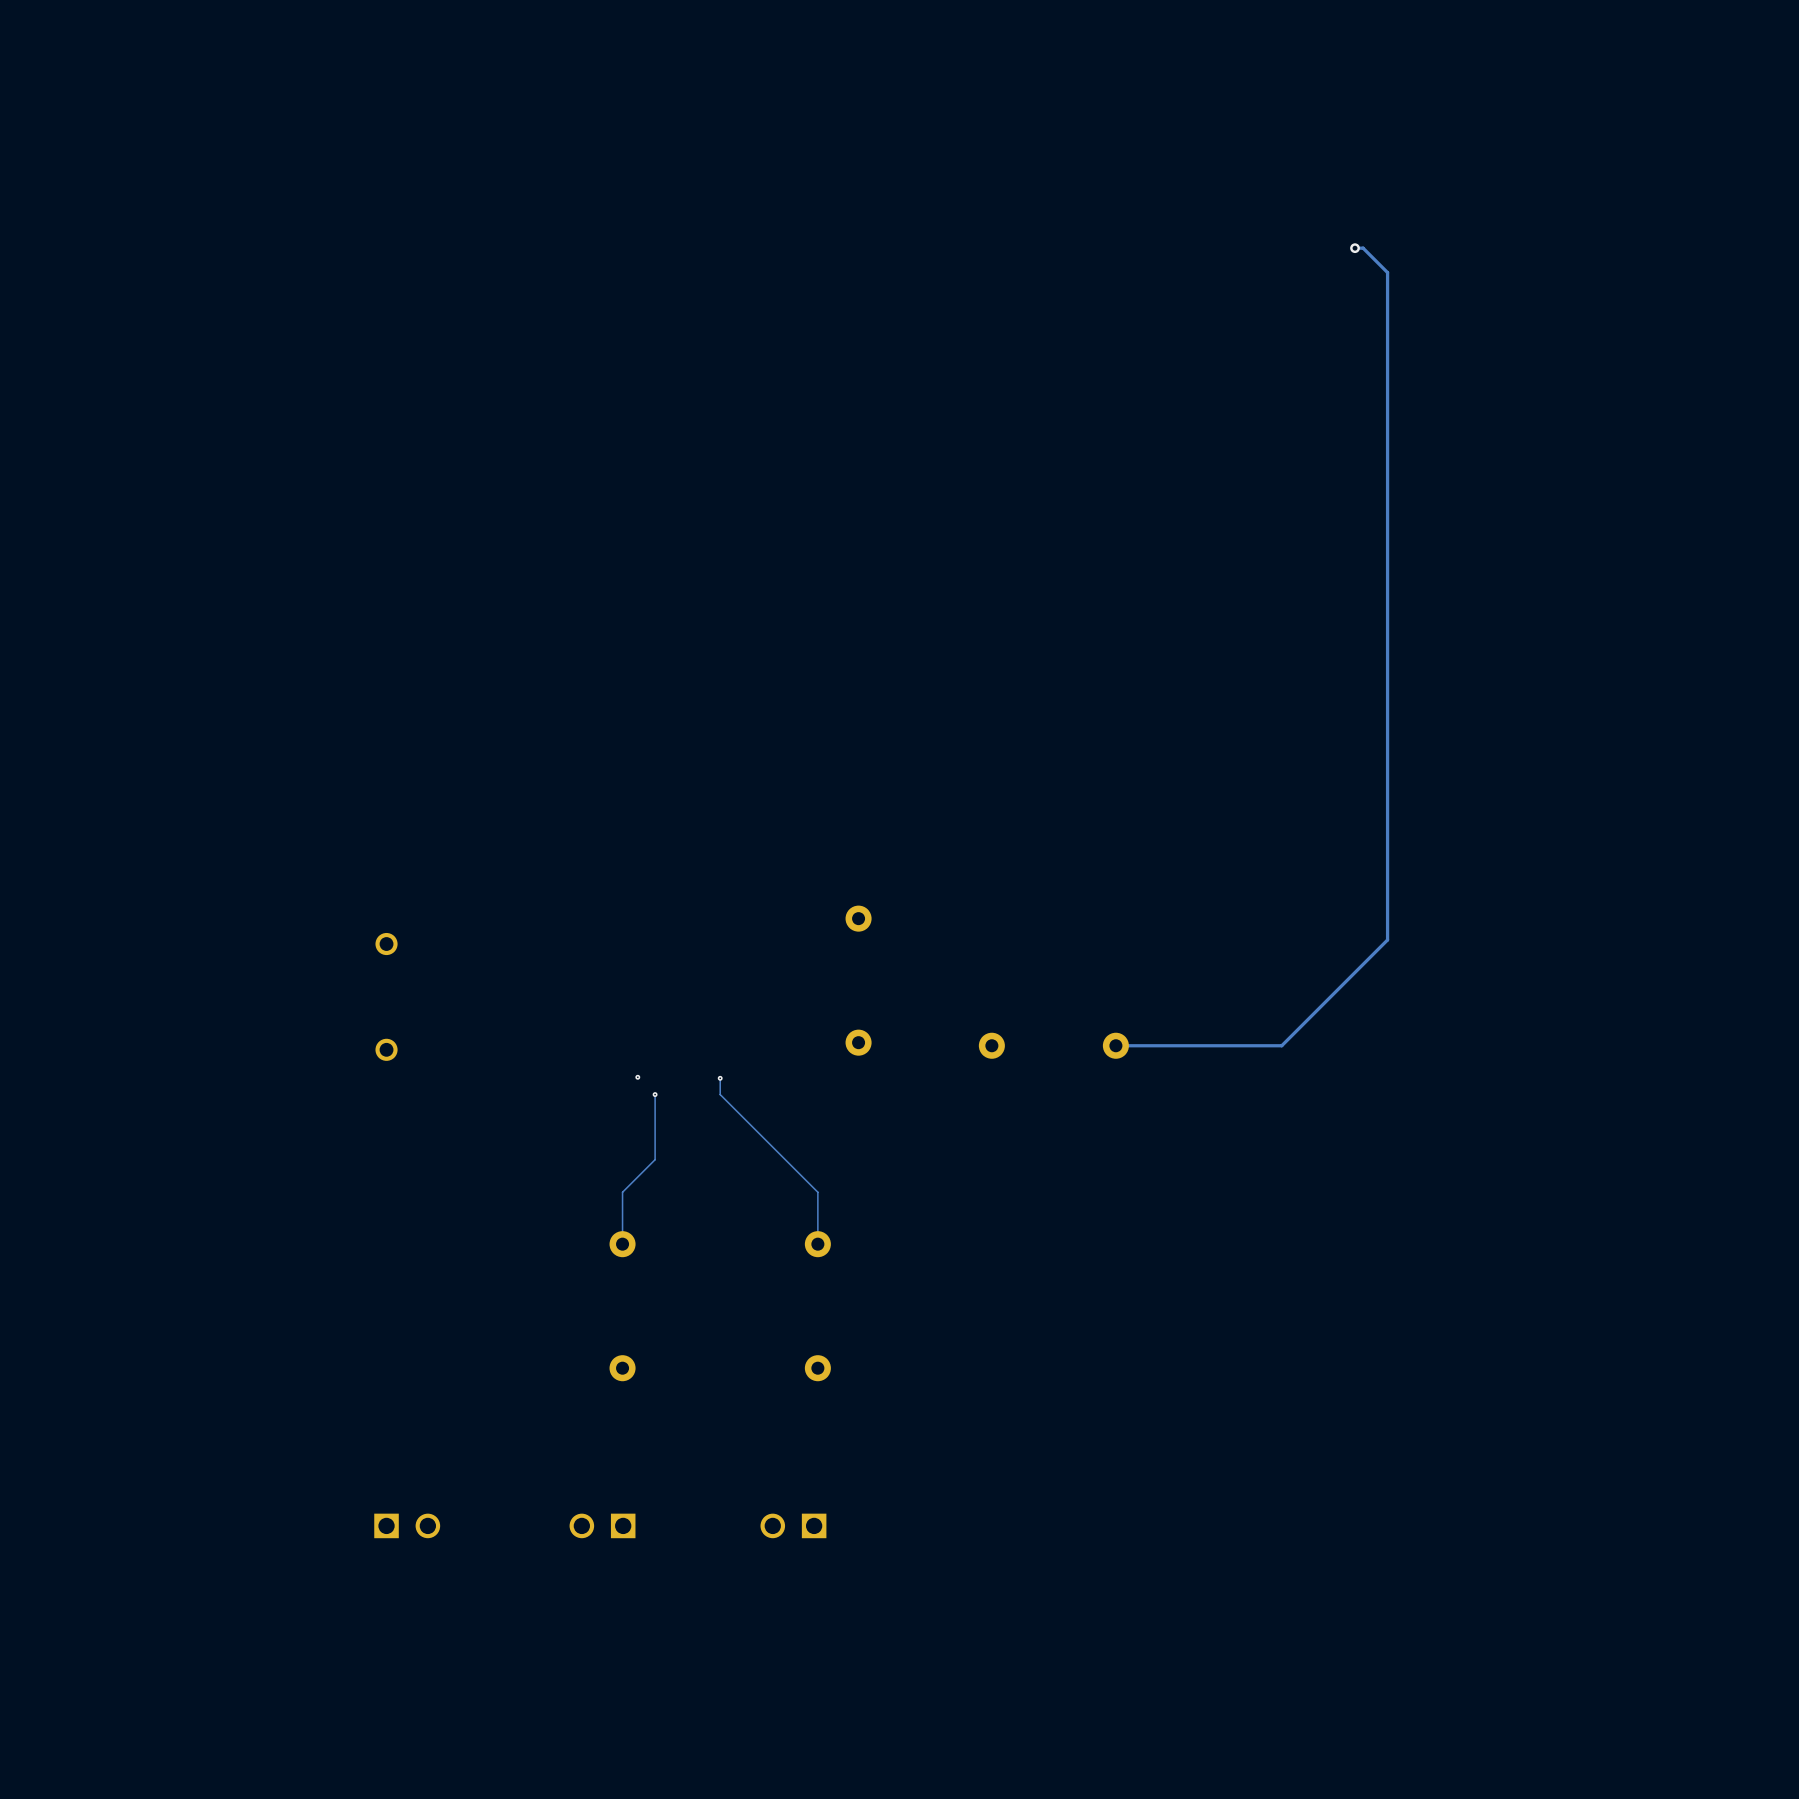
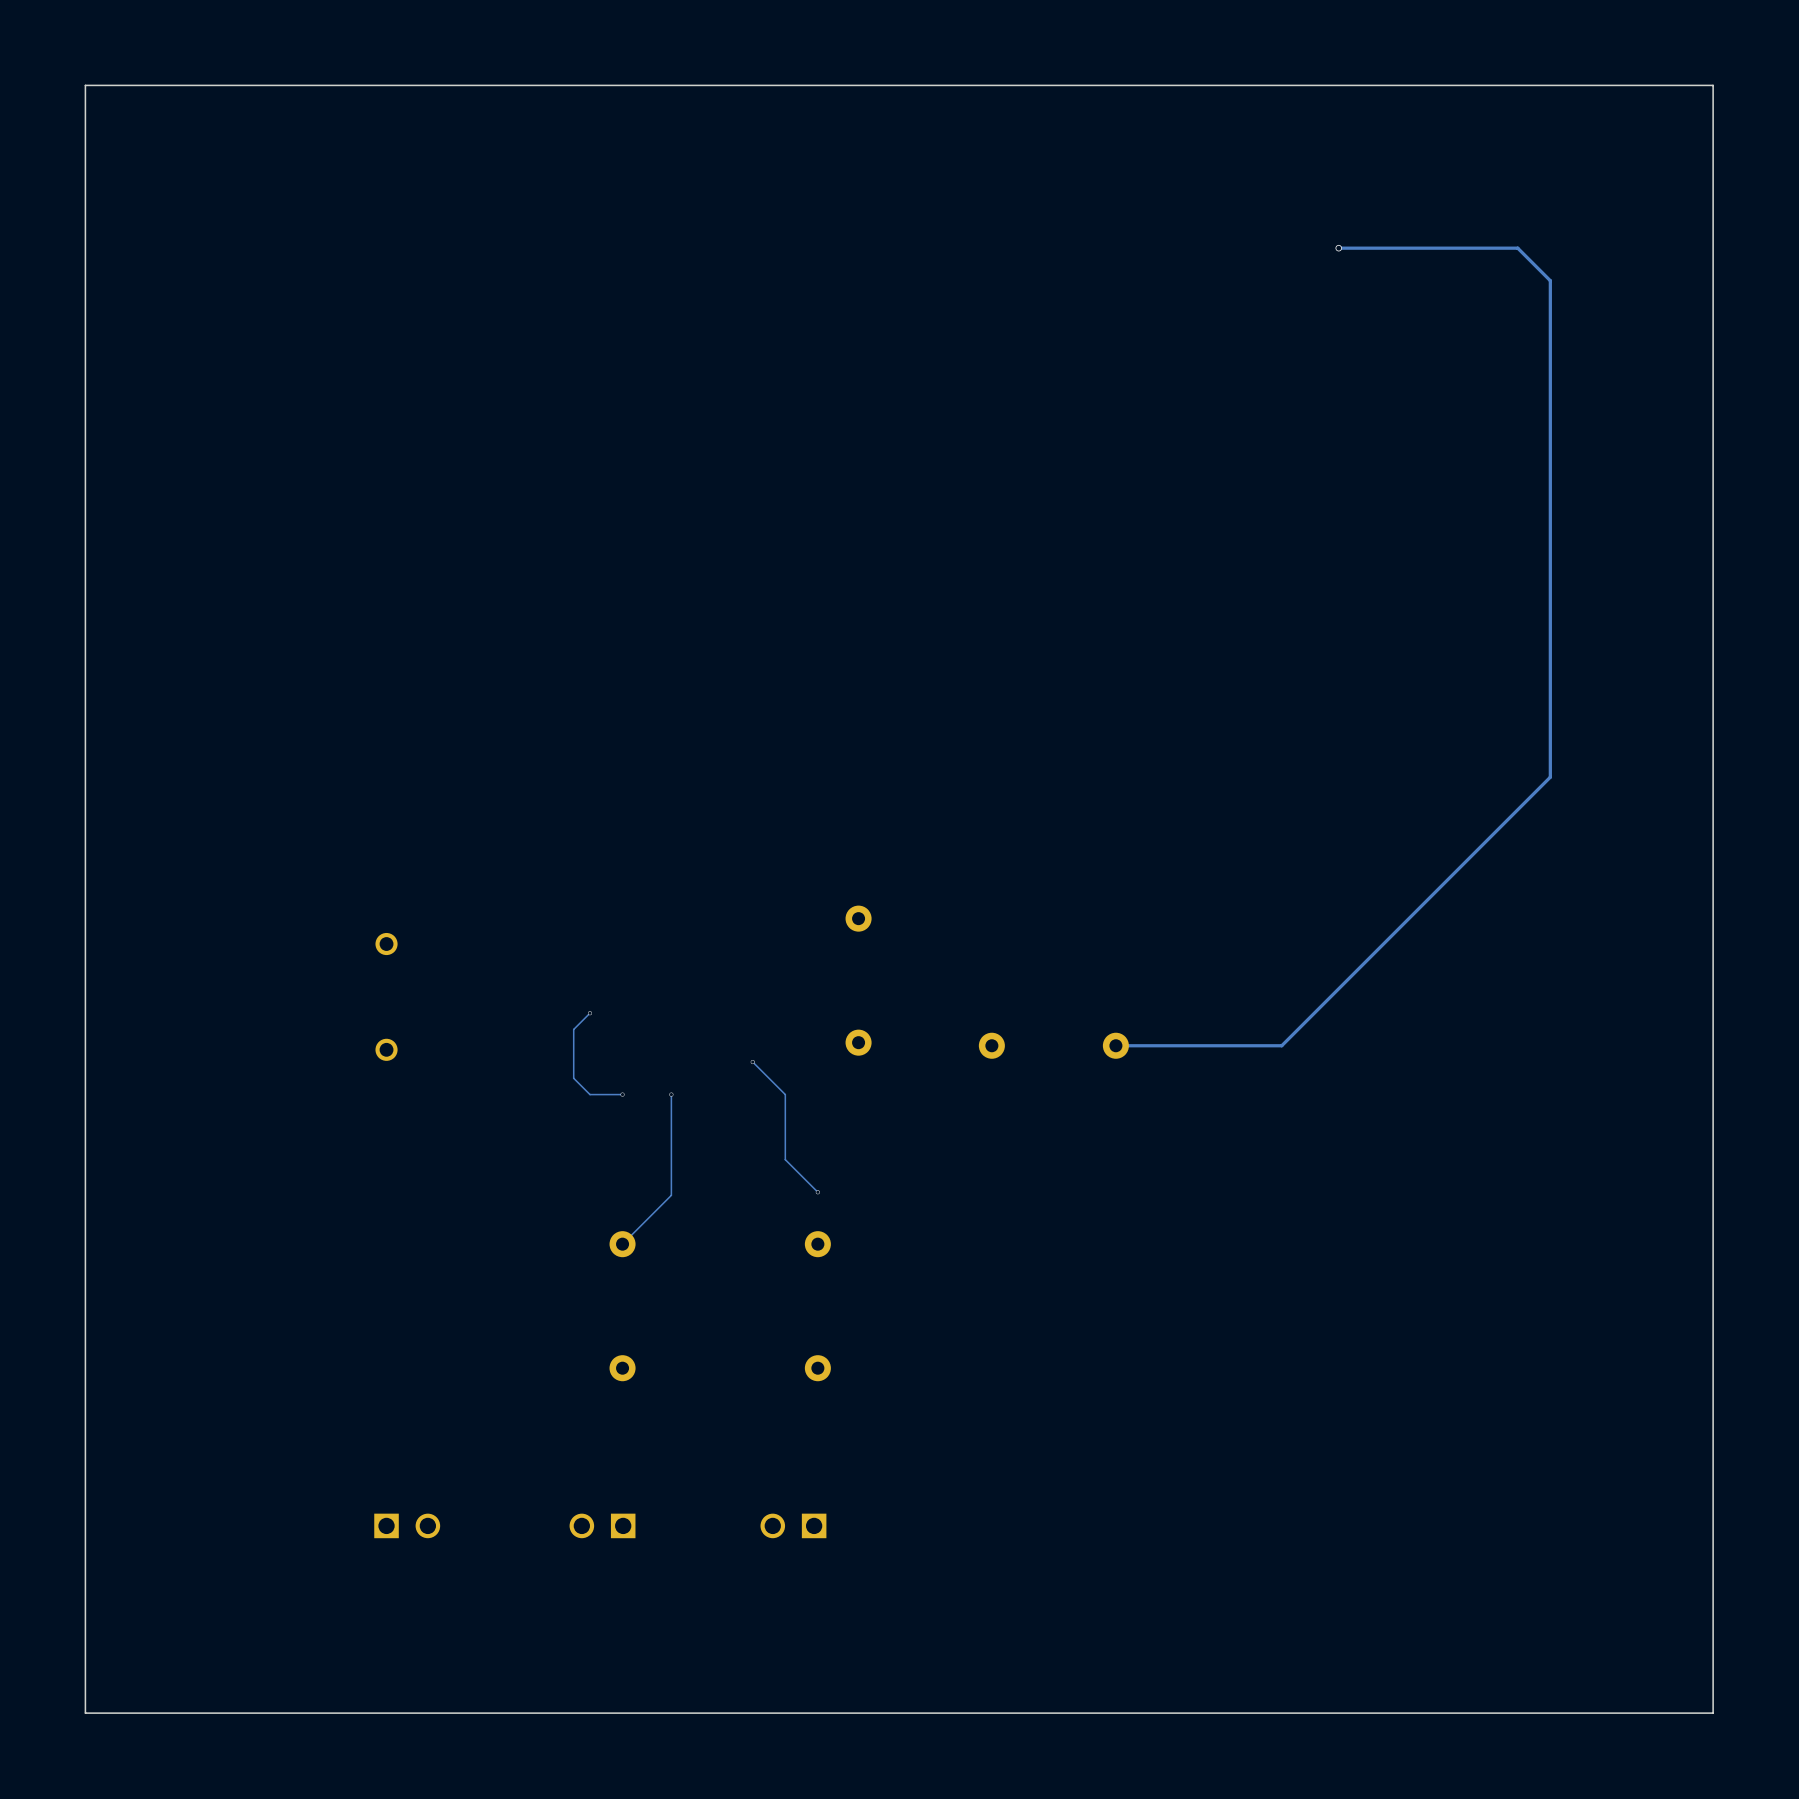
board edge: none -> (1713, 85) (85, 85) (85, 1713) (1713, 1713) (1713, 85)
via: none -> (1338, 248)
track: none -> (1355, 248) (1338, 248)
via: (1355, 248) -> none
track: (1363, 248) (1387, 272) (1387, 939) -> (1363, 248) (1517, 248) (1550, 280) (1550, 777) (1387, 939)
track: none -> (589, 1013) (573, 1029) (573, 1078) (589, 1094) (622, 1094)
via: none -> (589, 1013)
via: none -> (752, 1062)
via: (637, 1077) -> none
track: (720, 1078) (720, 1094) (785, 1159) -> (752, 1062) (785, 1094) (785, 1159)
via: (720, 1078) -> none
via: none -> (622, 1094)
track: (655, 1094) (655, 1159) (622, 1192) (622, 1244) -> (671, 1094) (671, 1195) (622, 1244)
via: (655, 1094) -> none
via: none -> (671, 1094)
track: (817, 1192) (817, 1244) -> none
via: none -> (817, 1192)

